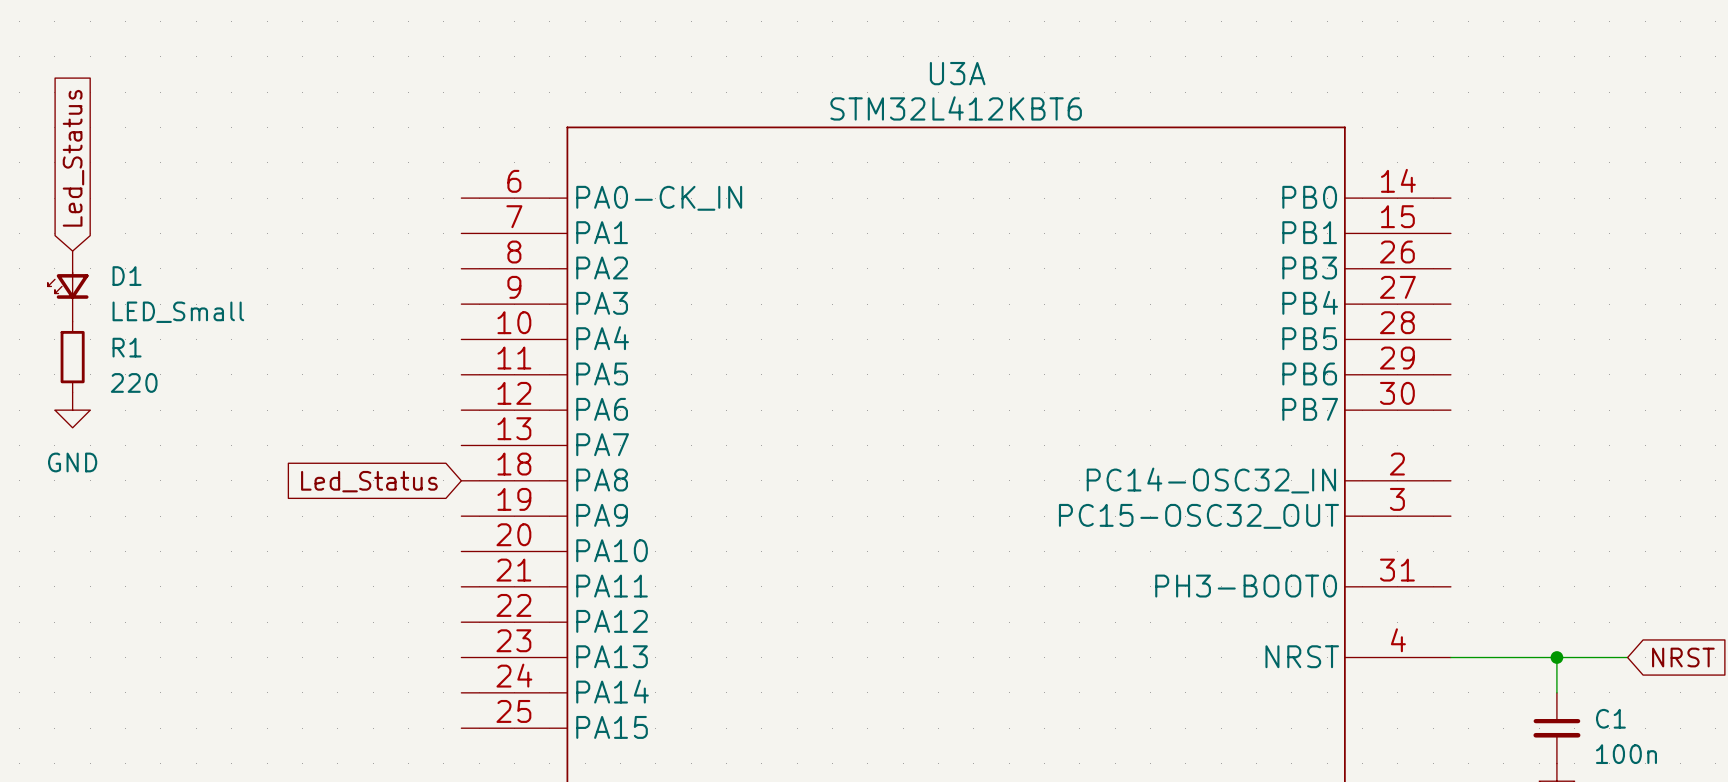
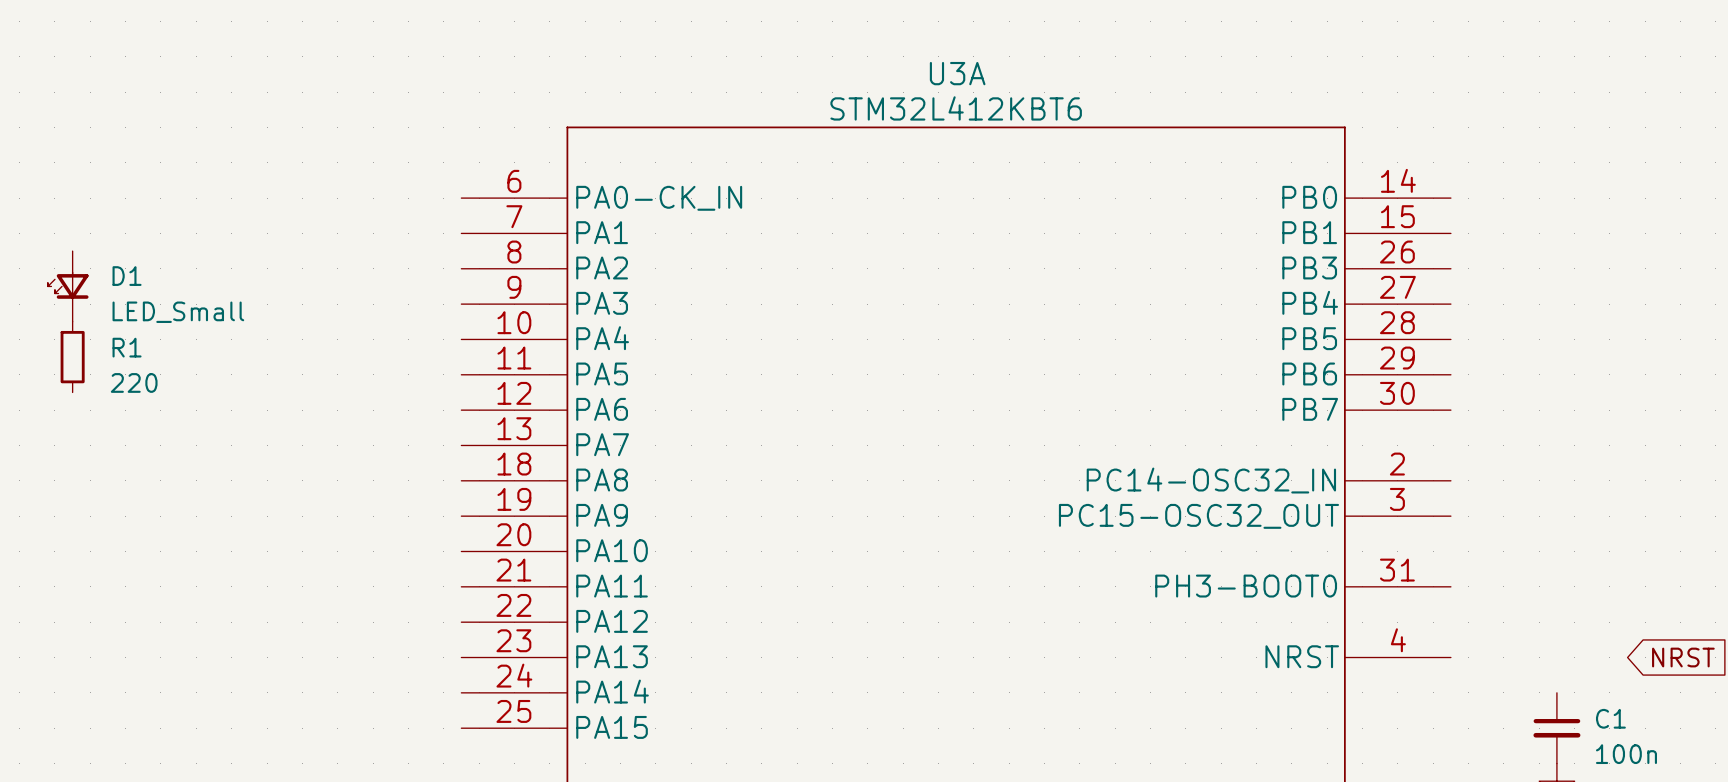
global label: Led_Status (73, 158) -> none
power symbol: GND (72, 410) -> none
global label: Led_Status (369, 481) -> none
wire: (1450, 657) (1627, 657) -> none
wire: (1556, 657) (1556, 692) -> none
junction: (1556, 657) -> none

